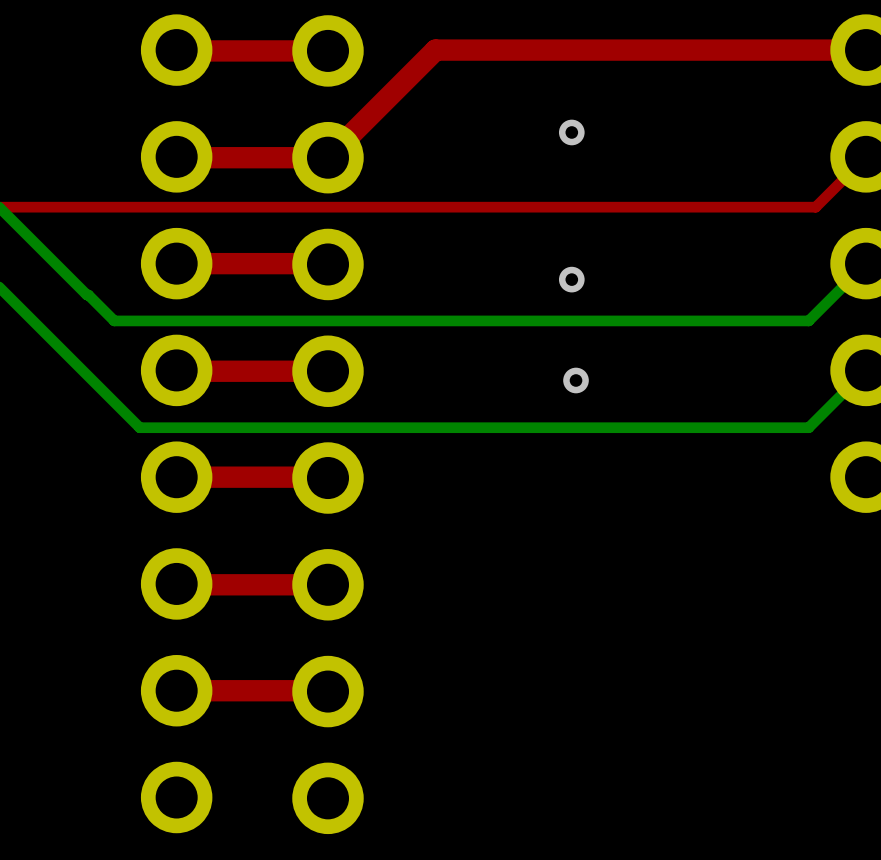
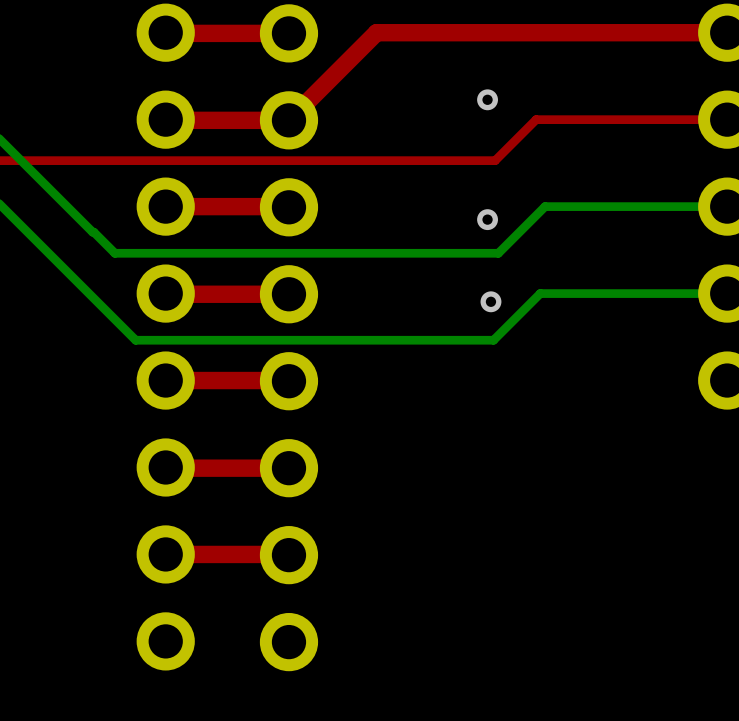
top track: (866, 156) (815, 207) (581, 207) -> (727, 119) (536, 119) (495, 160)
bottom track: (866, 263) (808, 320) (585, 320) -> (727, 206) (545, 206) (498, 253)
bottom track: (866, 370) (808, 427) (579, 427) -> (727, 293) (540, 293) (493, 340)

